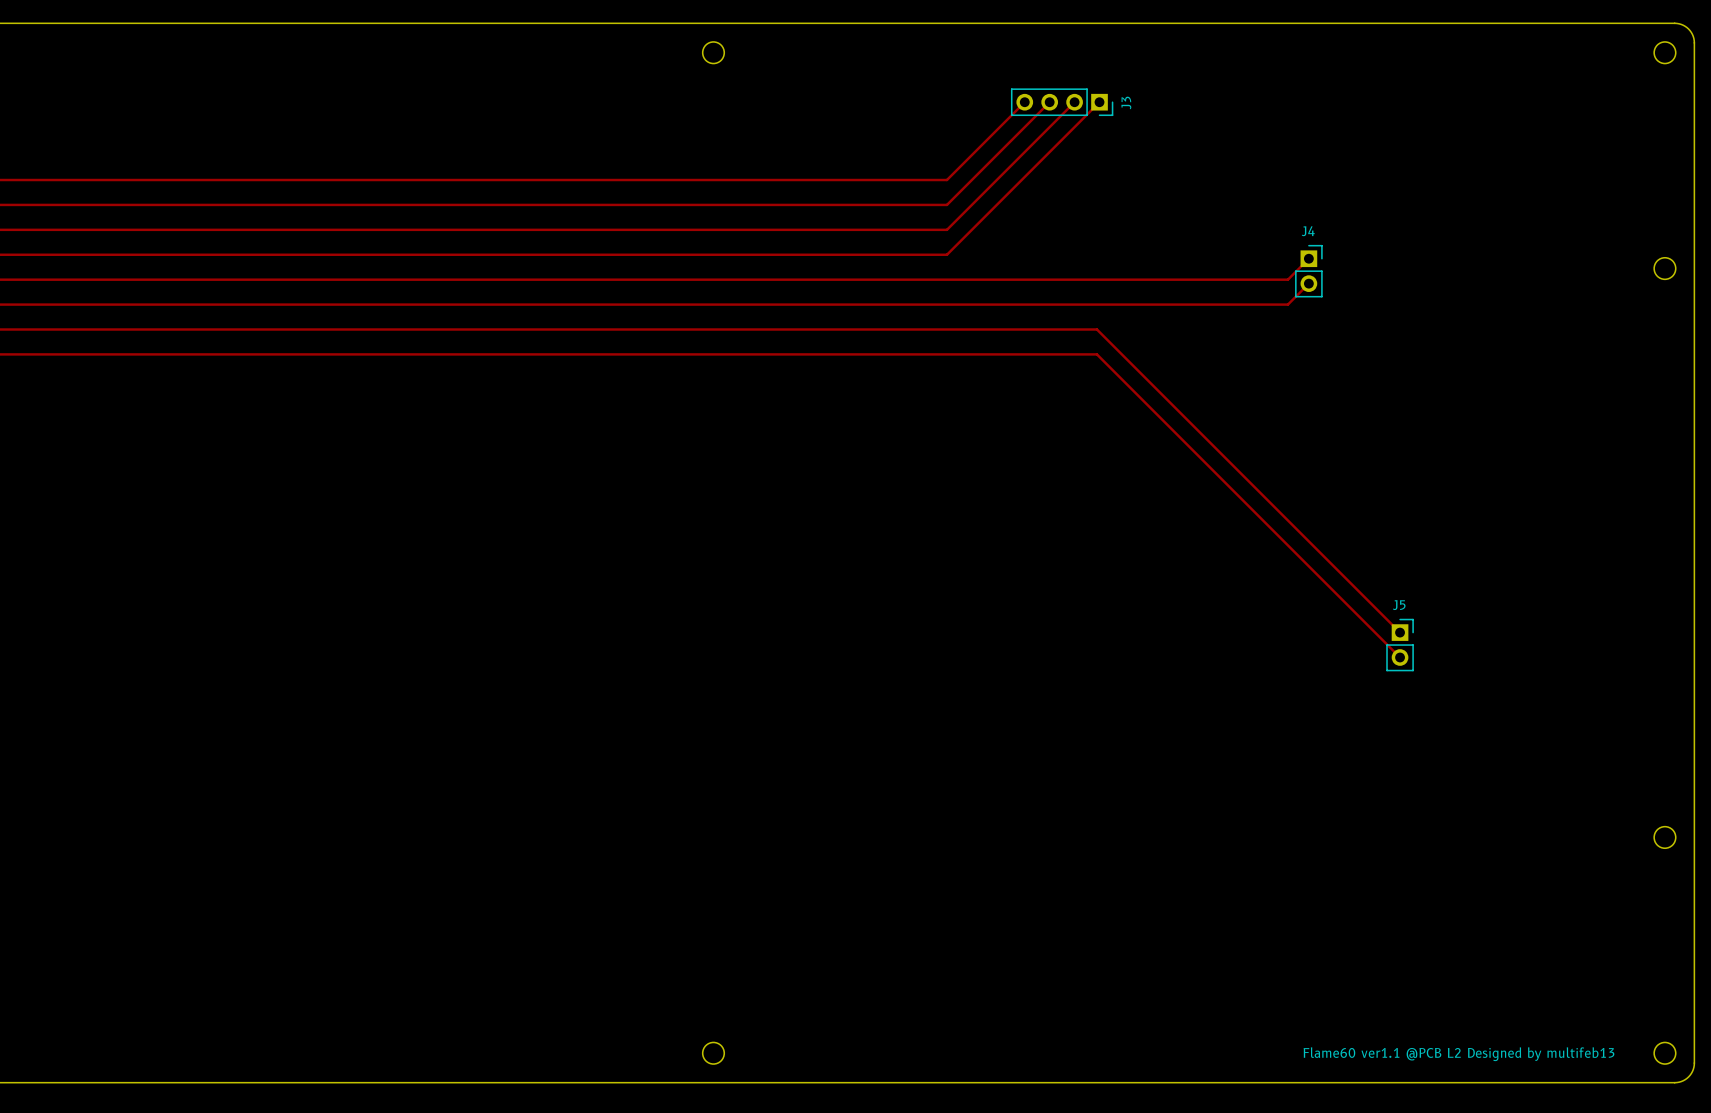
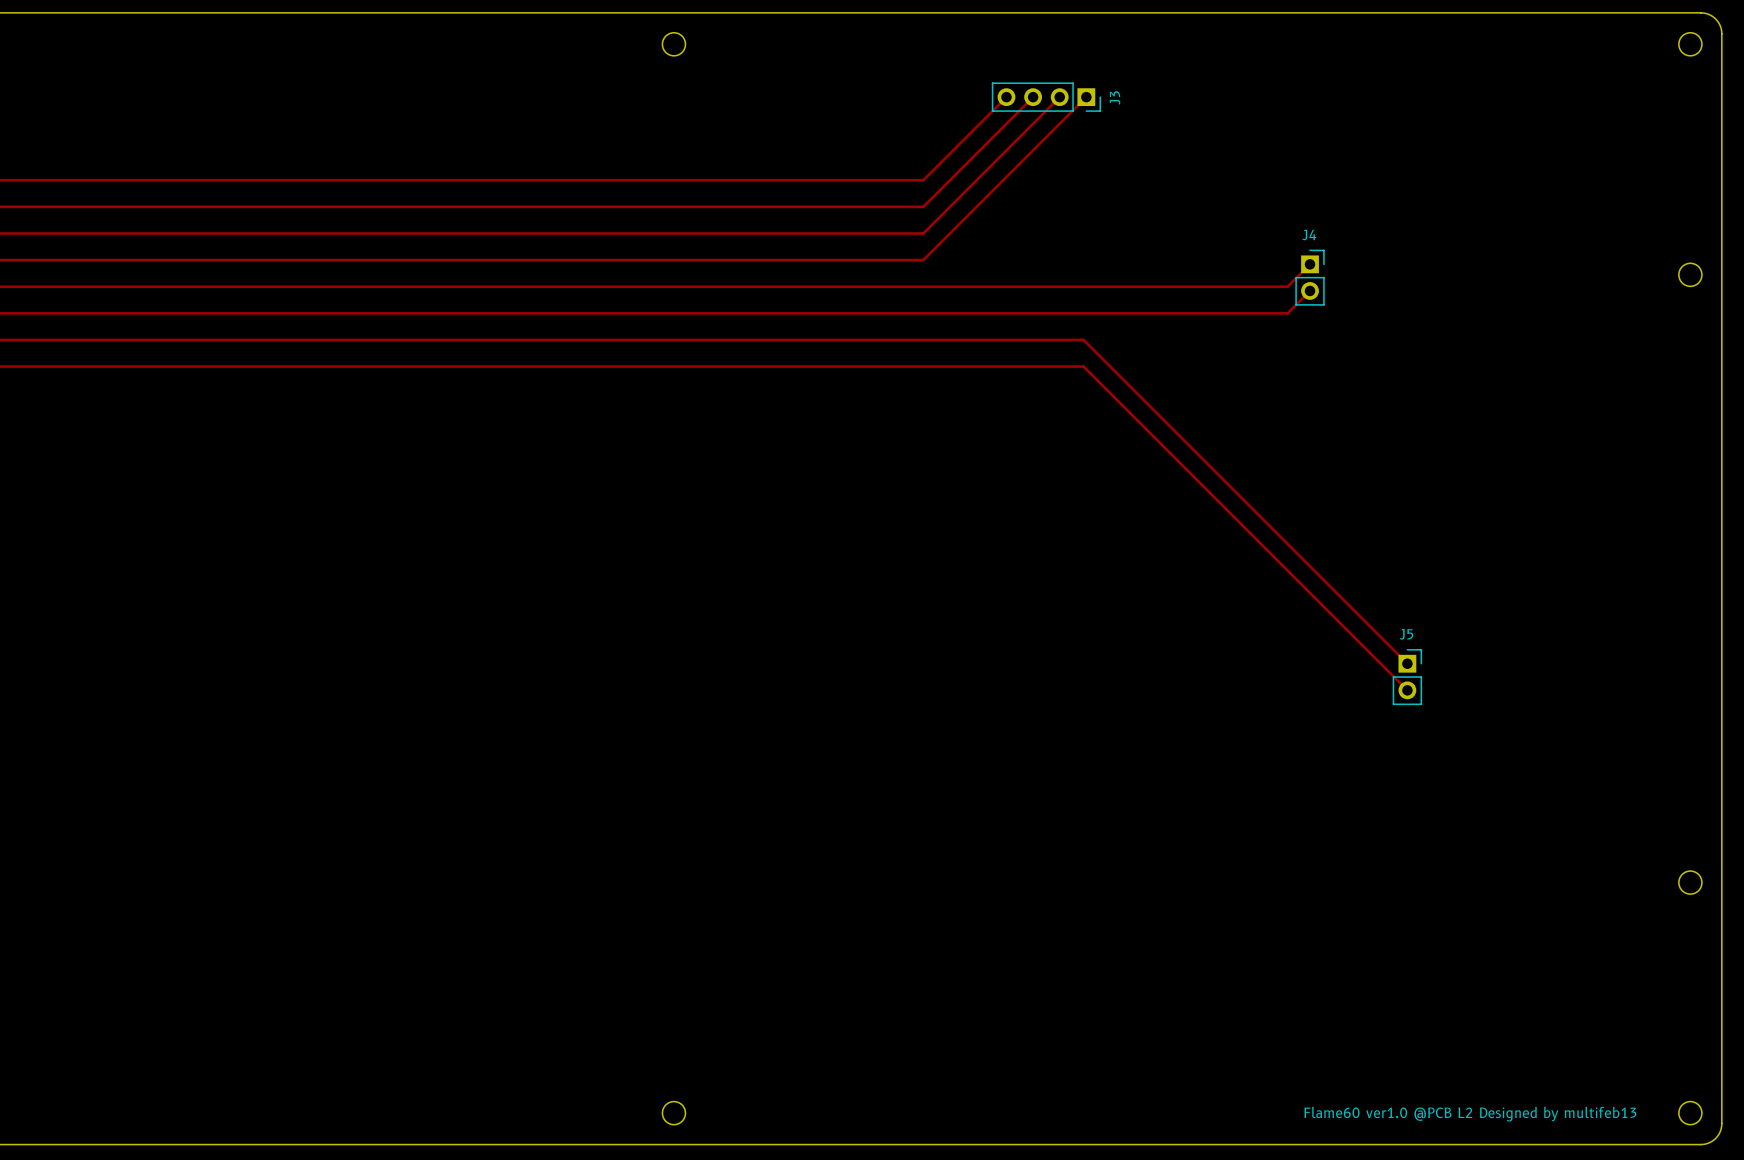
text: Flame60 ver1.1 @PCB L2 Designed by multifeb13 (1458, 1054) -> Flame60 ver1.0 @PCB L2 Designed by multifeb13 (1470, 1114)

